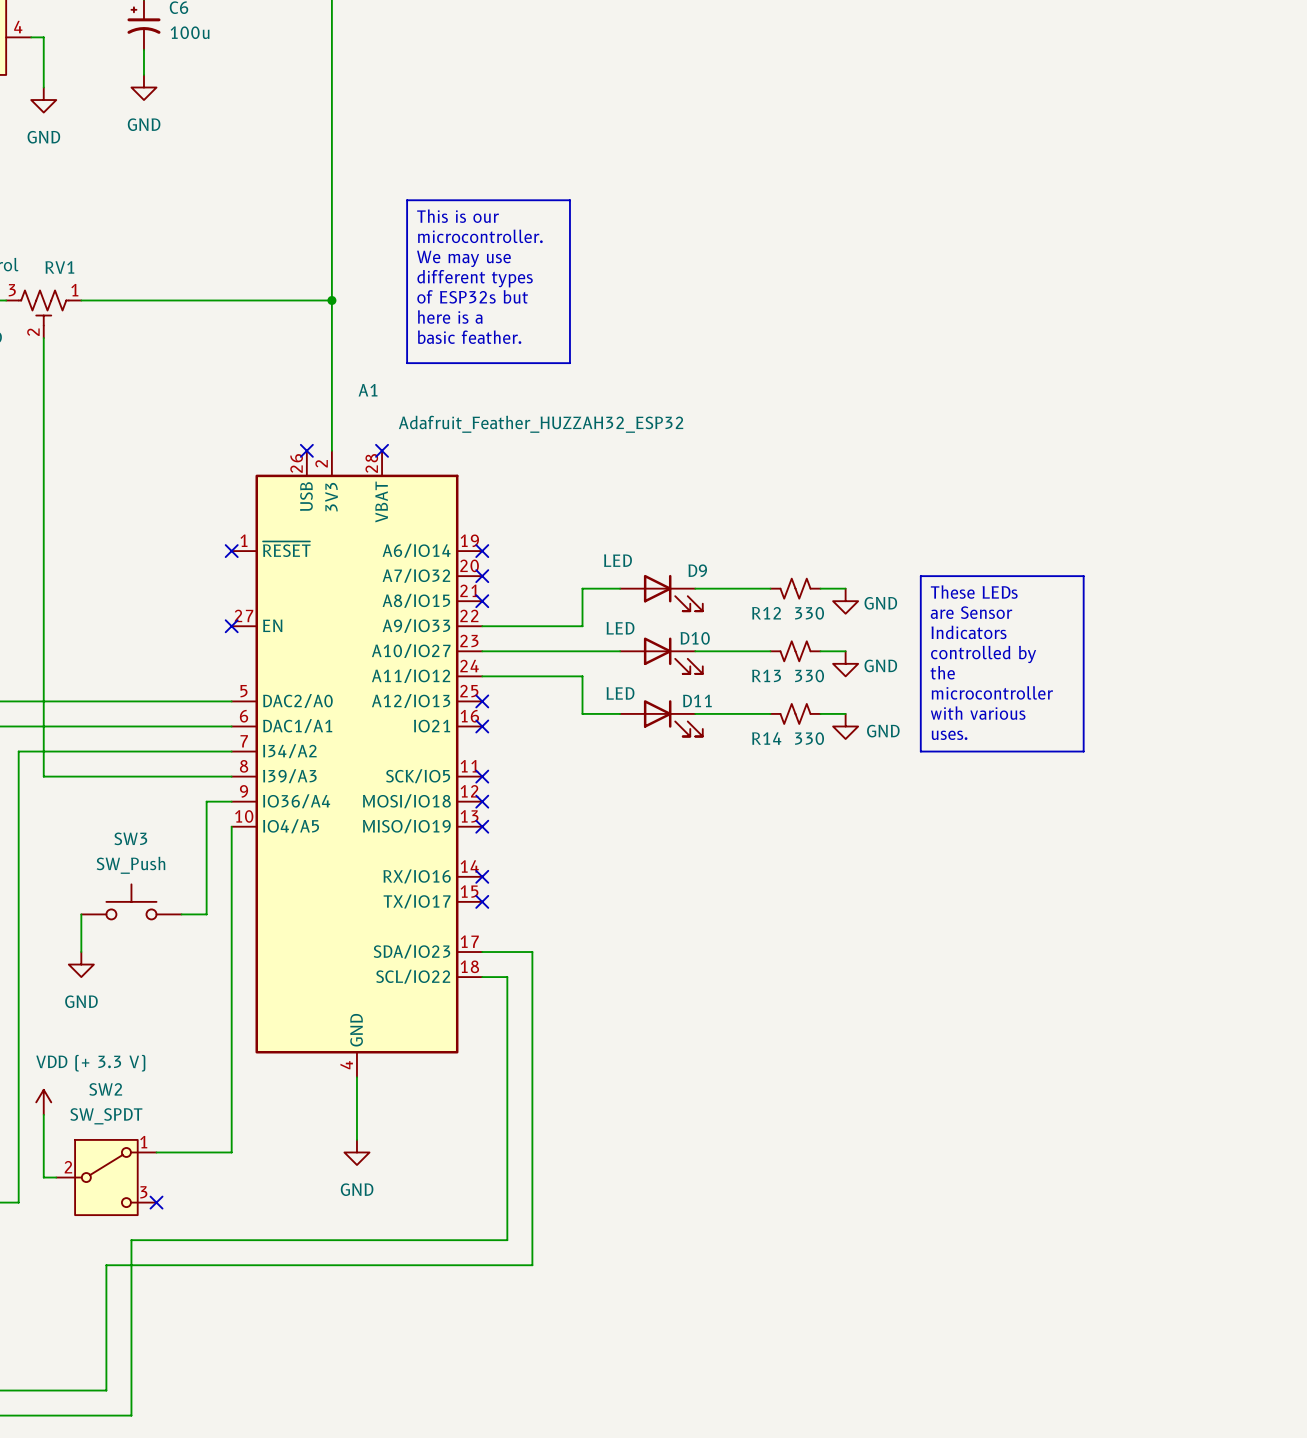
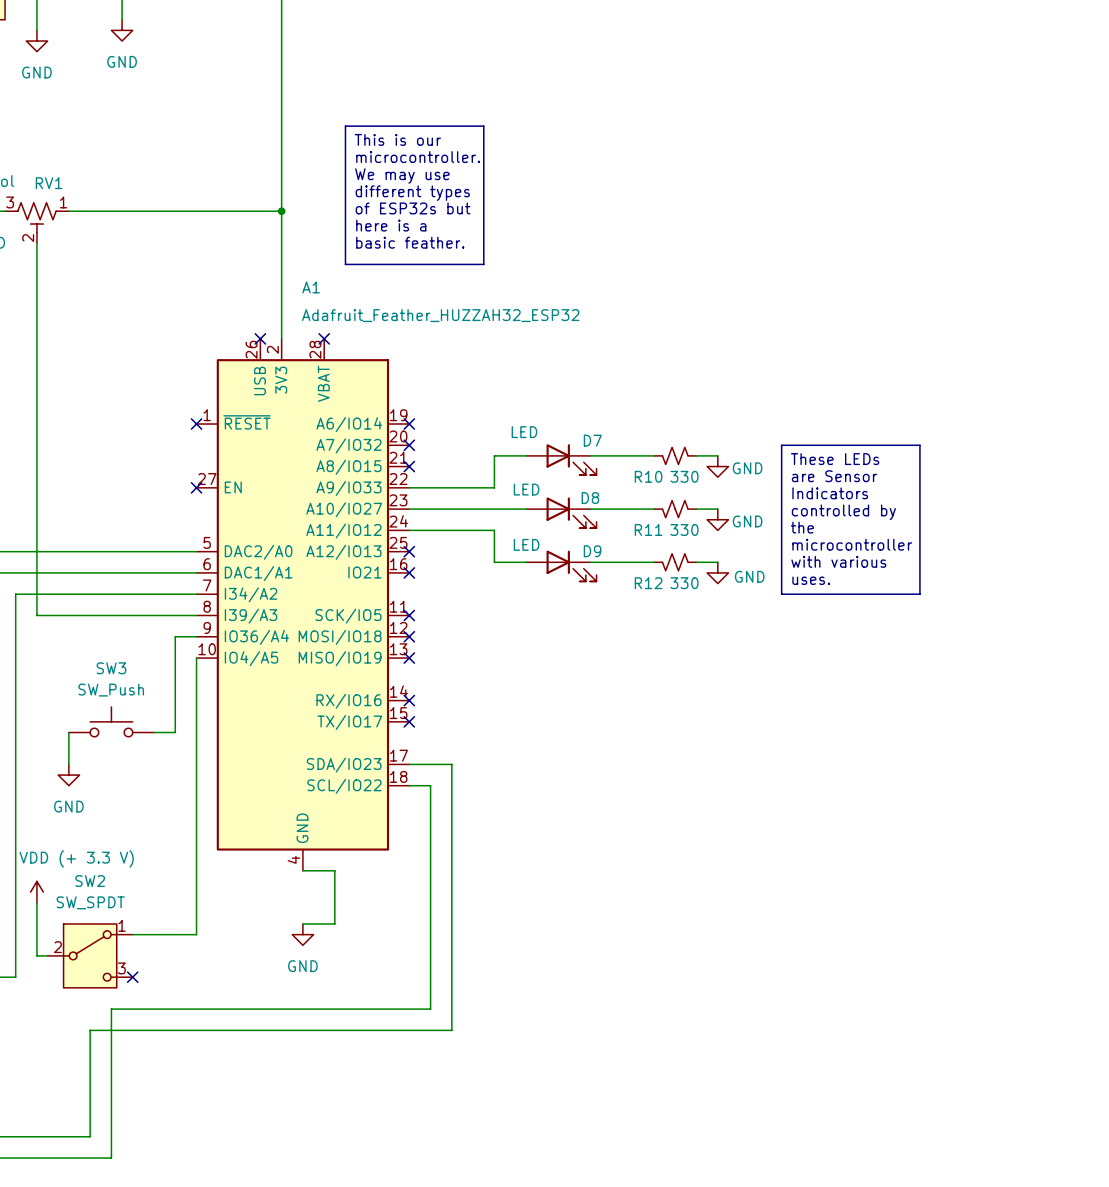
D9 name: D9 (697, 570) -> D7 (592, 440)
R12 name: R12 (766, 613) -> R10 (648, 476)
D10 name: D10 (695, 638) -> D8 (590, 498)
R13 name: R13 (766, 675) -> R11 (648, 529)
D11 name: D11 (697, 700) -> D9 (592, 551)
R14 name: R14 (766, 738) -> R12 (648, 583)
wire: (356, 1077) (356, 1139) -> (302, 870) (334, 870) (334, 924) (302, 924)

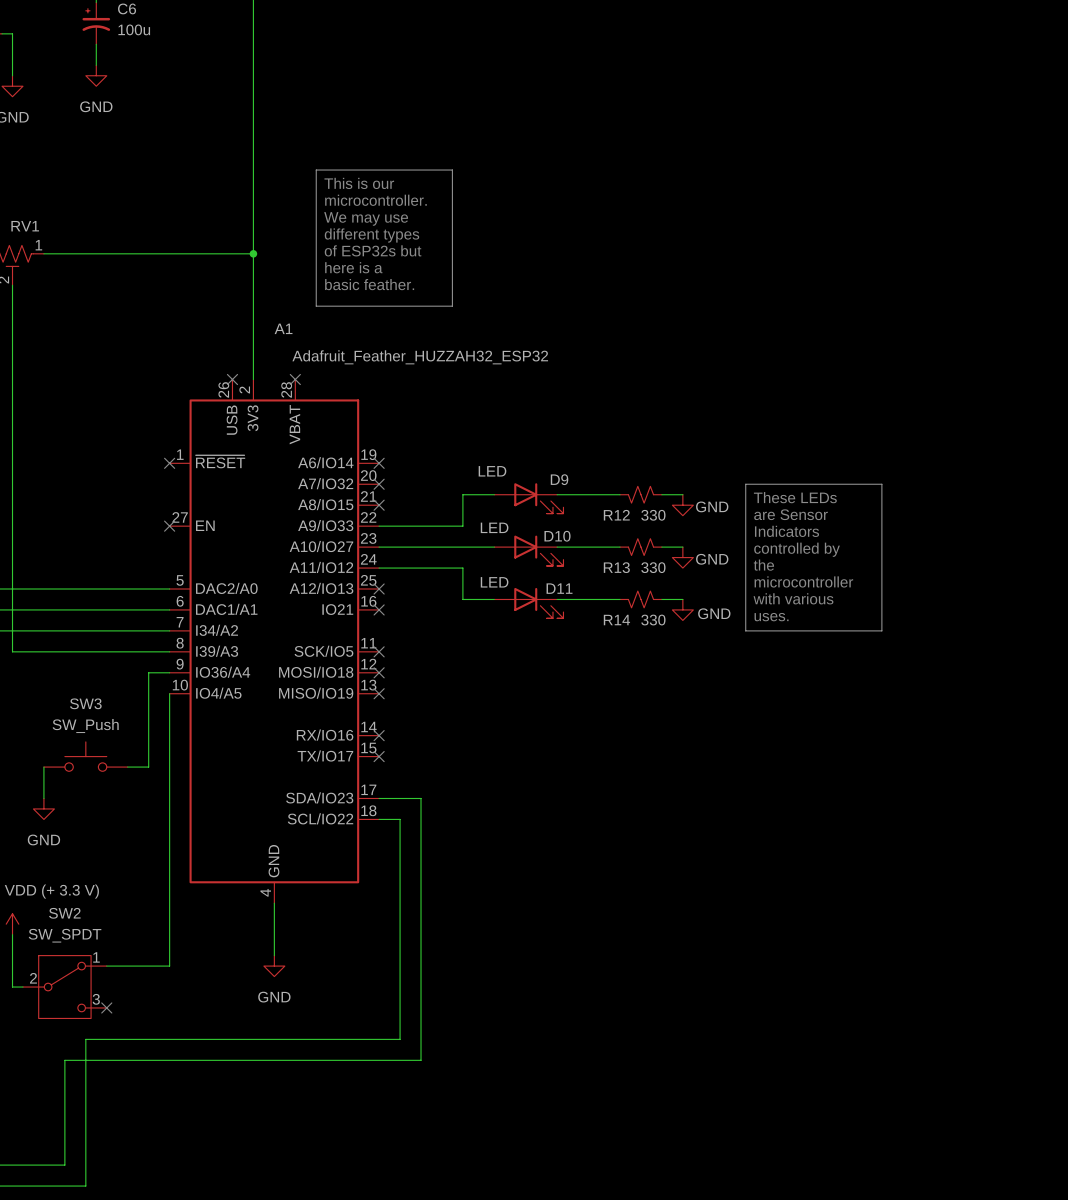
D7 name: D7 (592, 440) -> D9 (559, 479)
R10 name: R10 (648, 476) -> R12 (616, 515)
D8 name: D8 (590, 498) -> D10 (557, 536)
R11 name: R11 (648, 529) -> R13 (616, 567)
D9 name: D9 (592, 551) -> D11 (559, 588)
R12 name: R12 (648, 583) -> R14 (616, 620)
wire: (302, 870) (334, 870) (334, 924) (302, 924) -> (274, 903) (274, 955)

